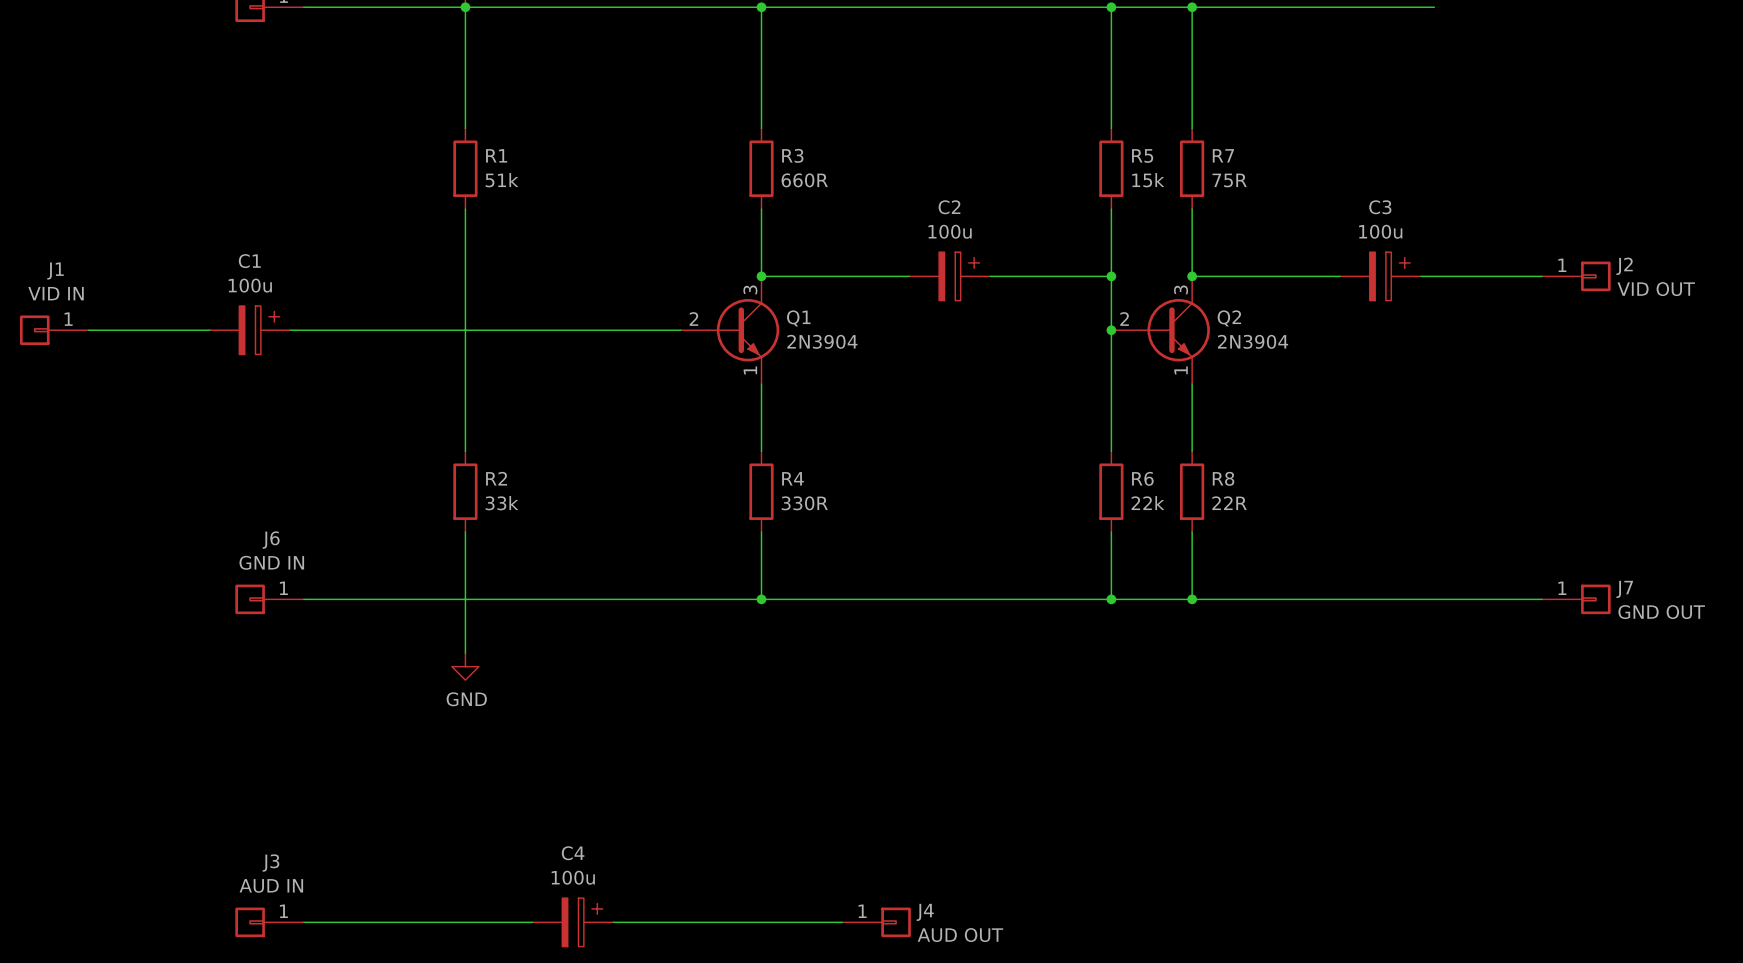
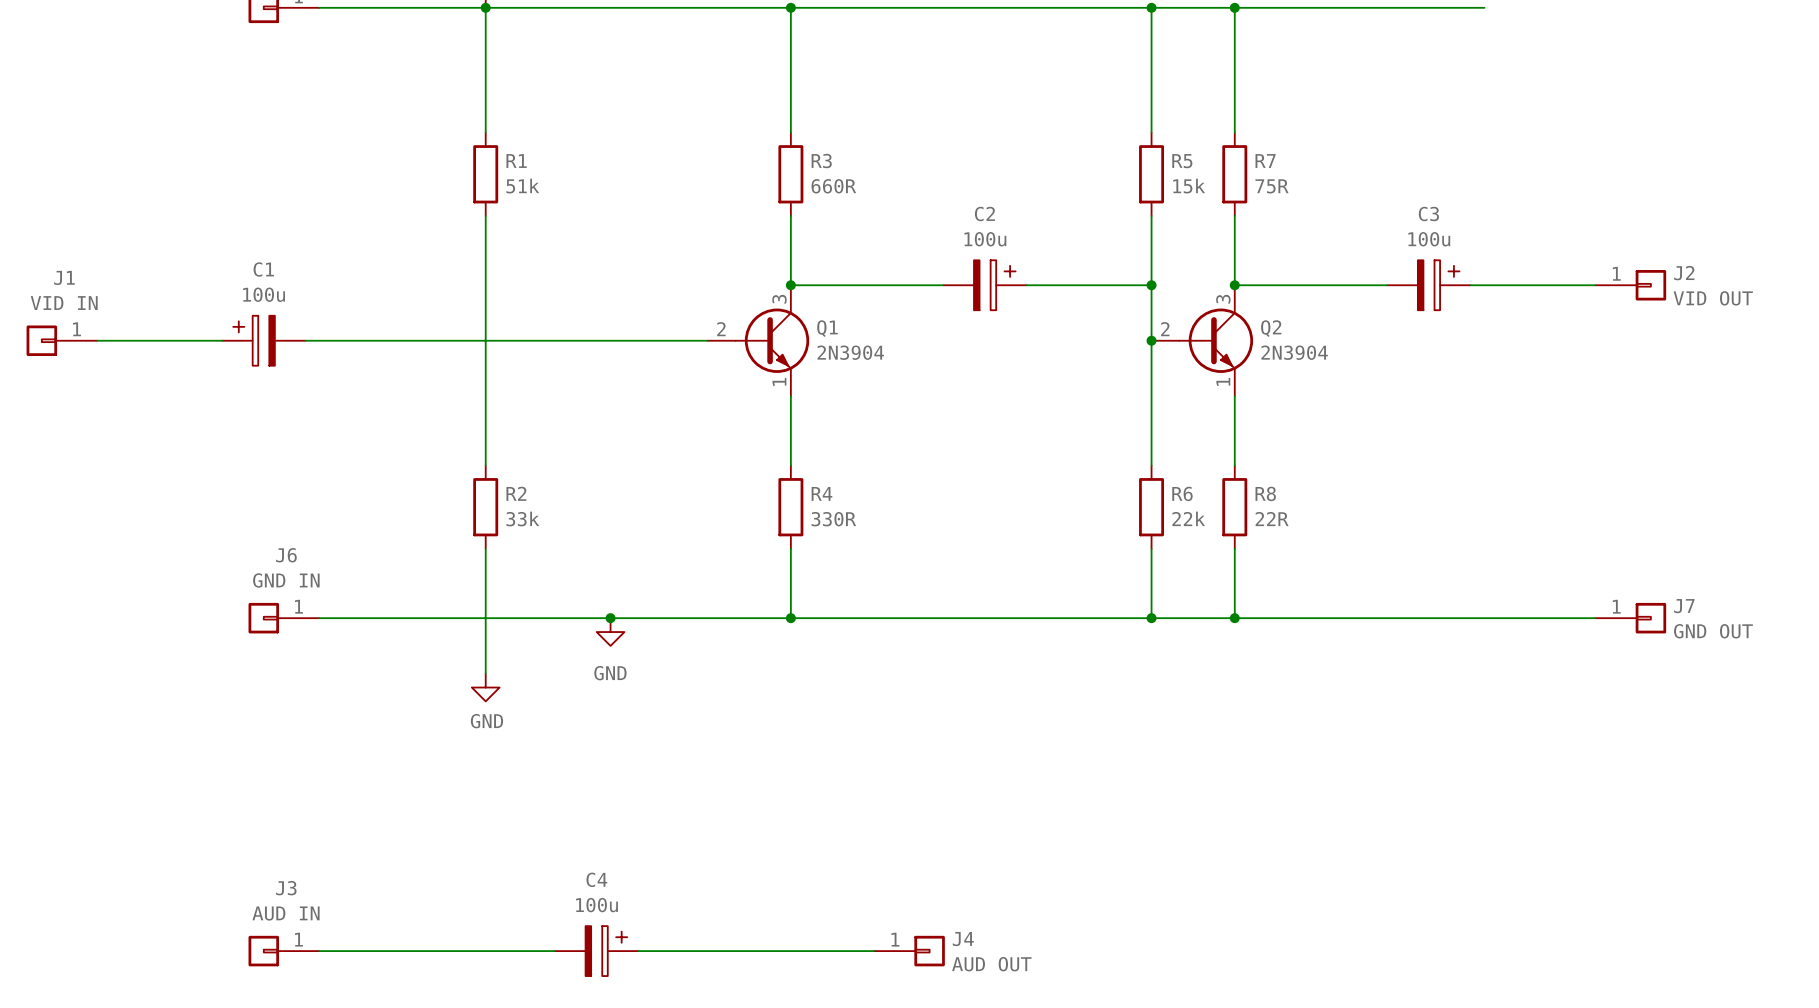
C1 flip: as is (259, 330) -> left-right (254, 340)
junction: none -> (610, 618)
power symbol: none -> GND (610, 632)

